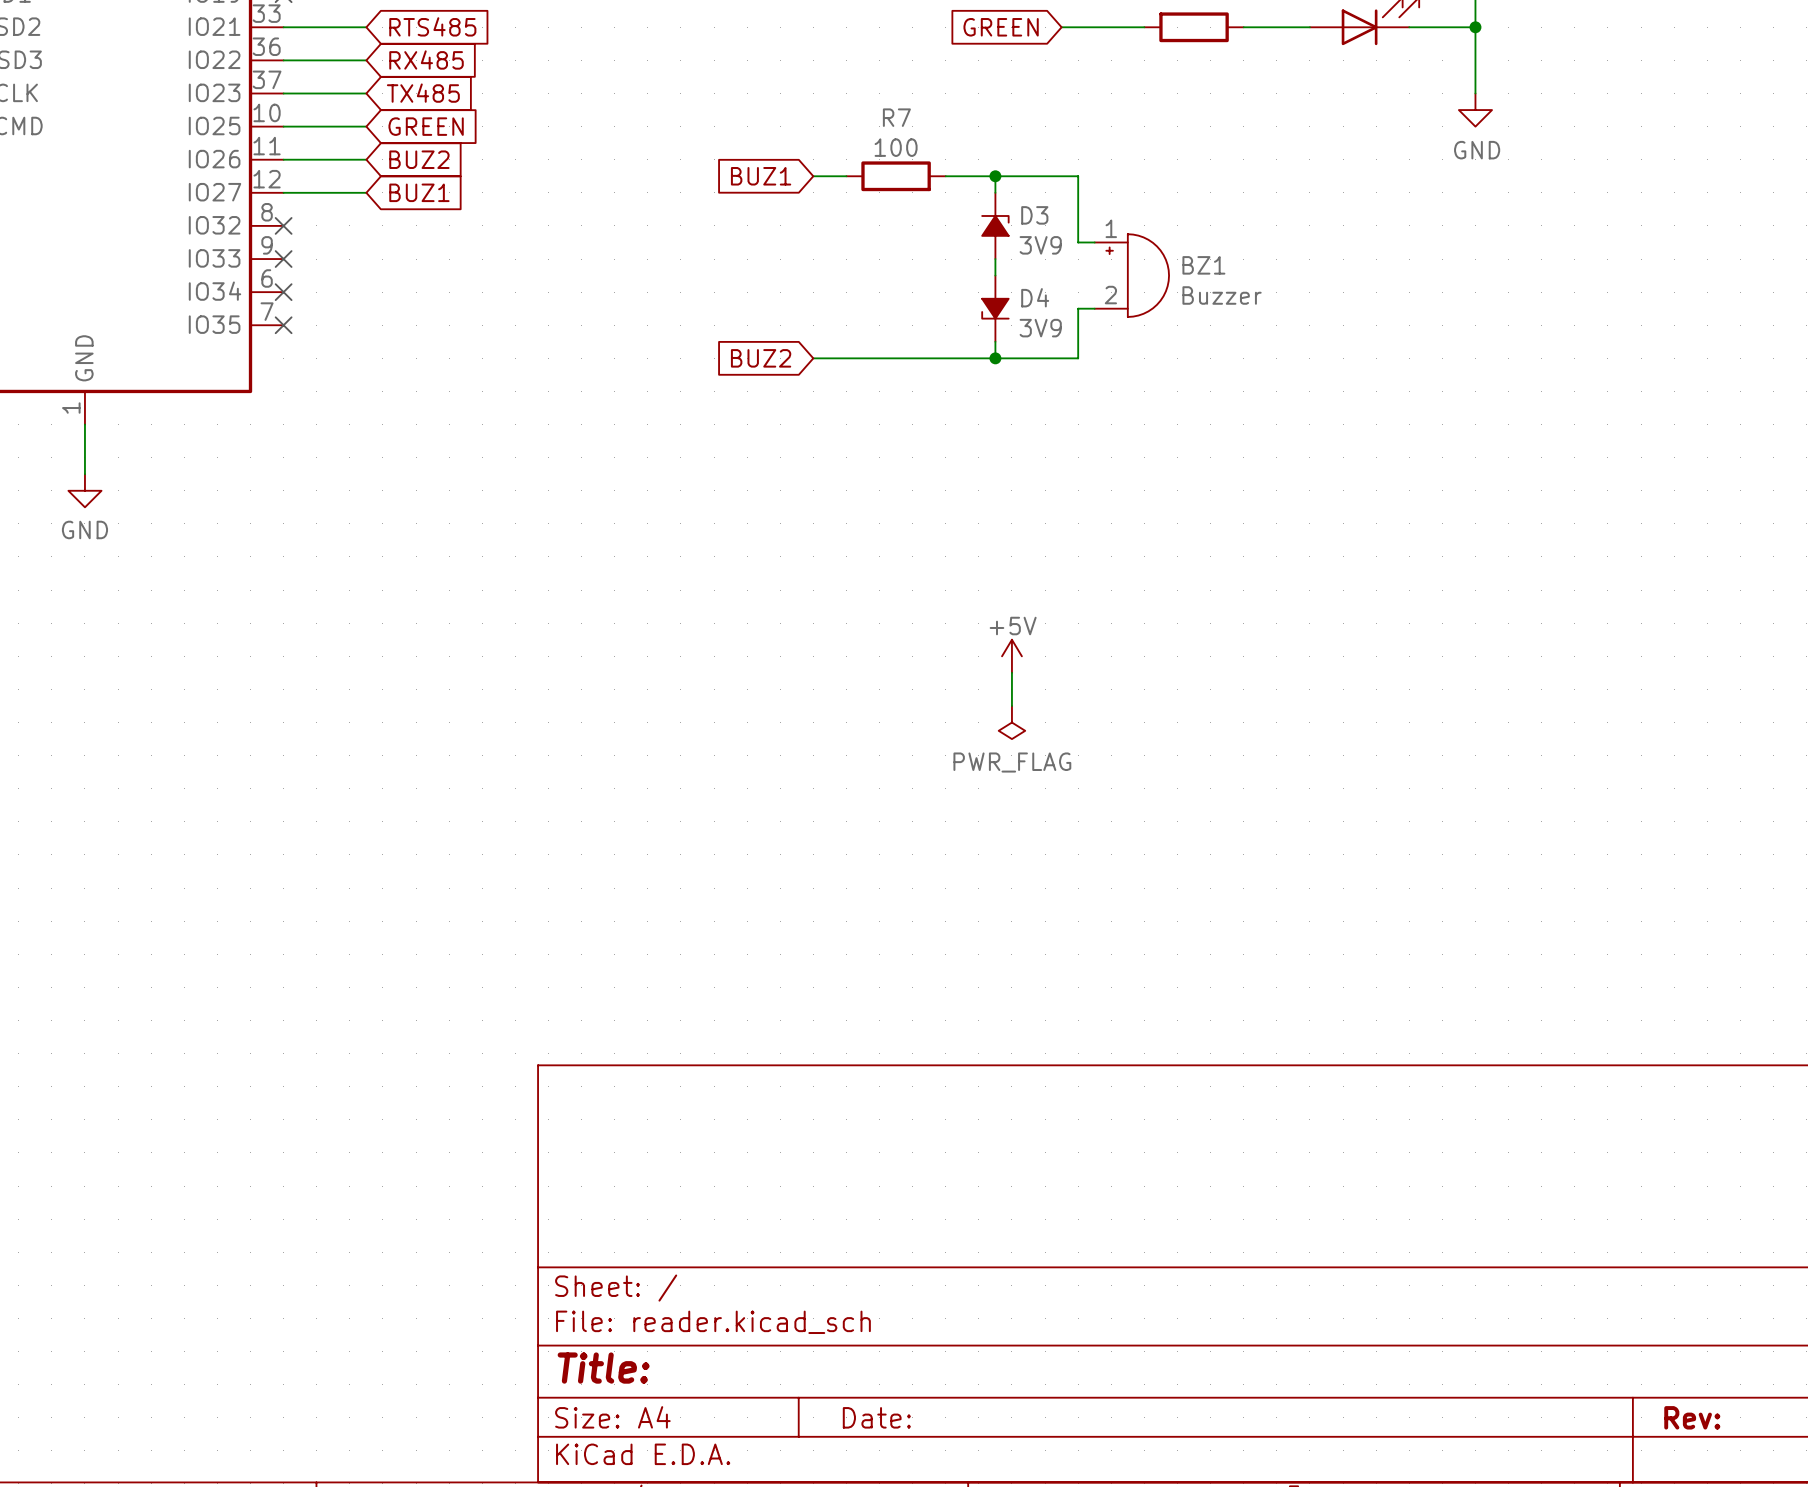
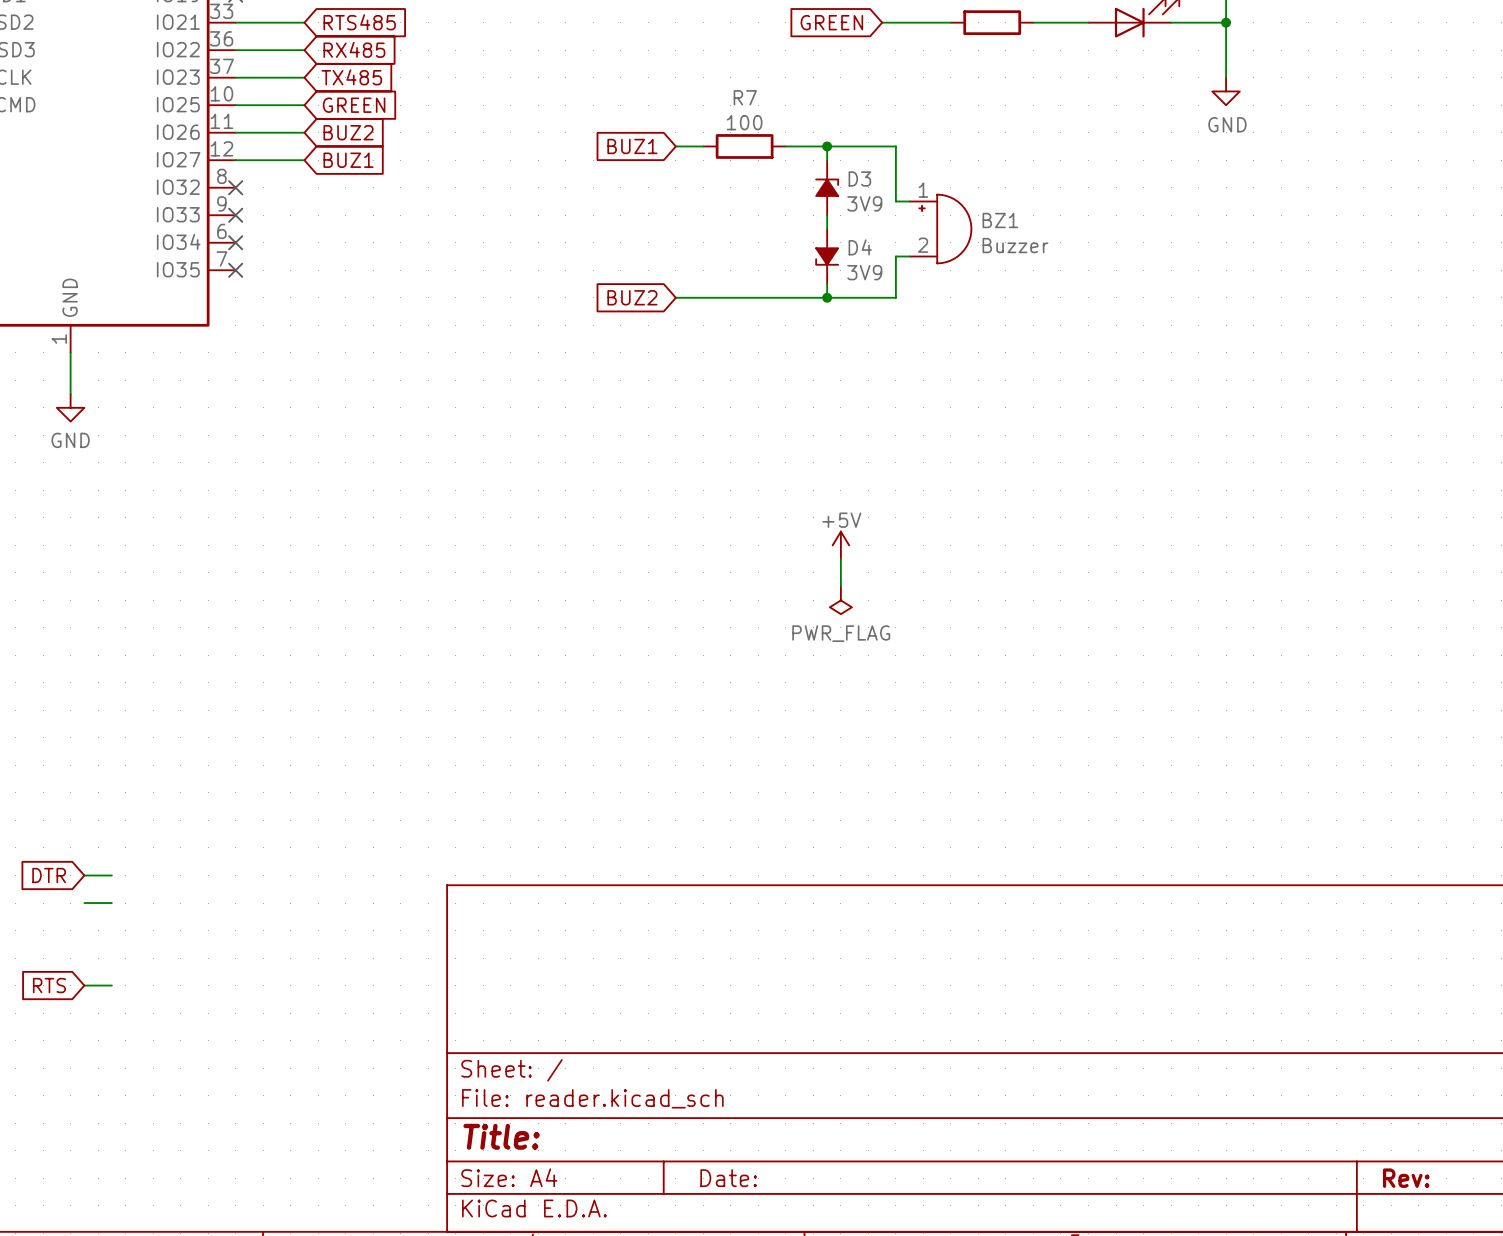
global label: none -> DTR (49, 875)
wire: none -> (84, 875) (111, 875)
wire: none -> (84, 903) (111, 903)
global label: none -> RTS (49, 985)
wire: none -> (84, 985) (111, 985)

